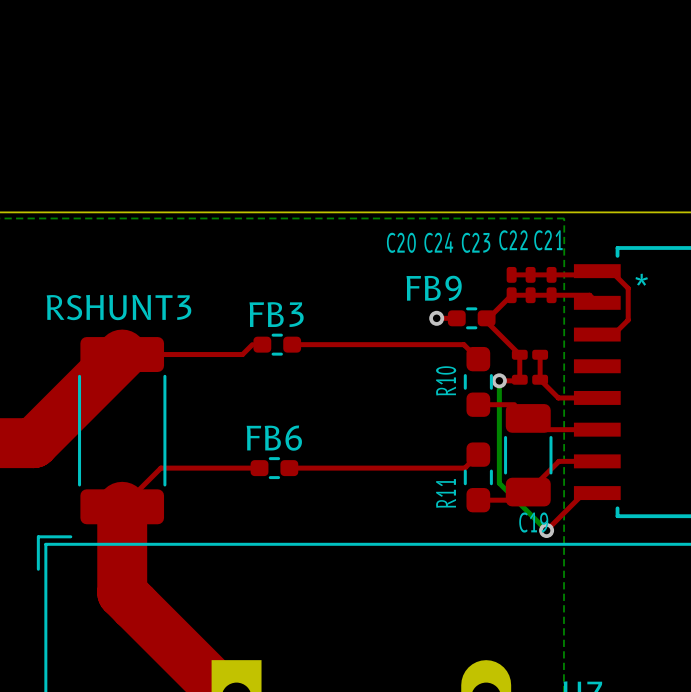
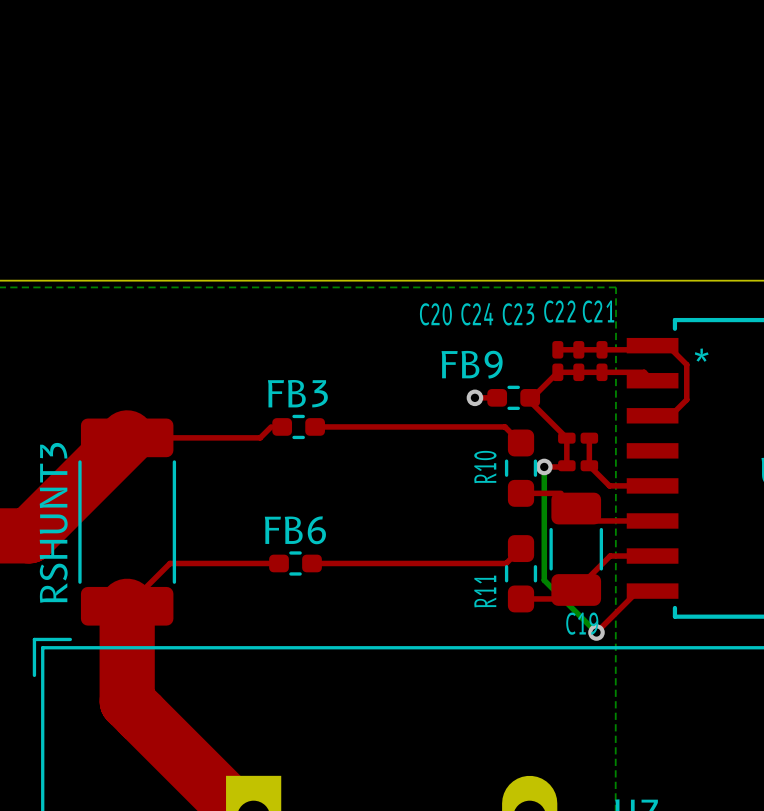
RSHUNT3 name rotation: 0° (119, 307) -> 90° counterclockwise (53, 522)

